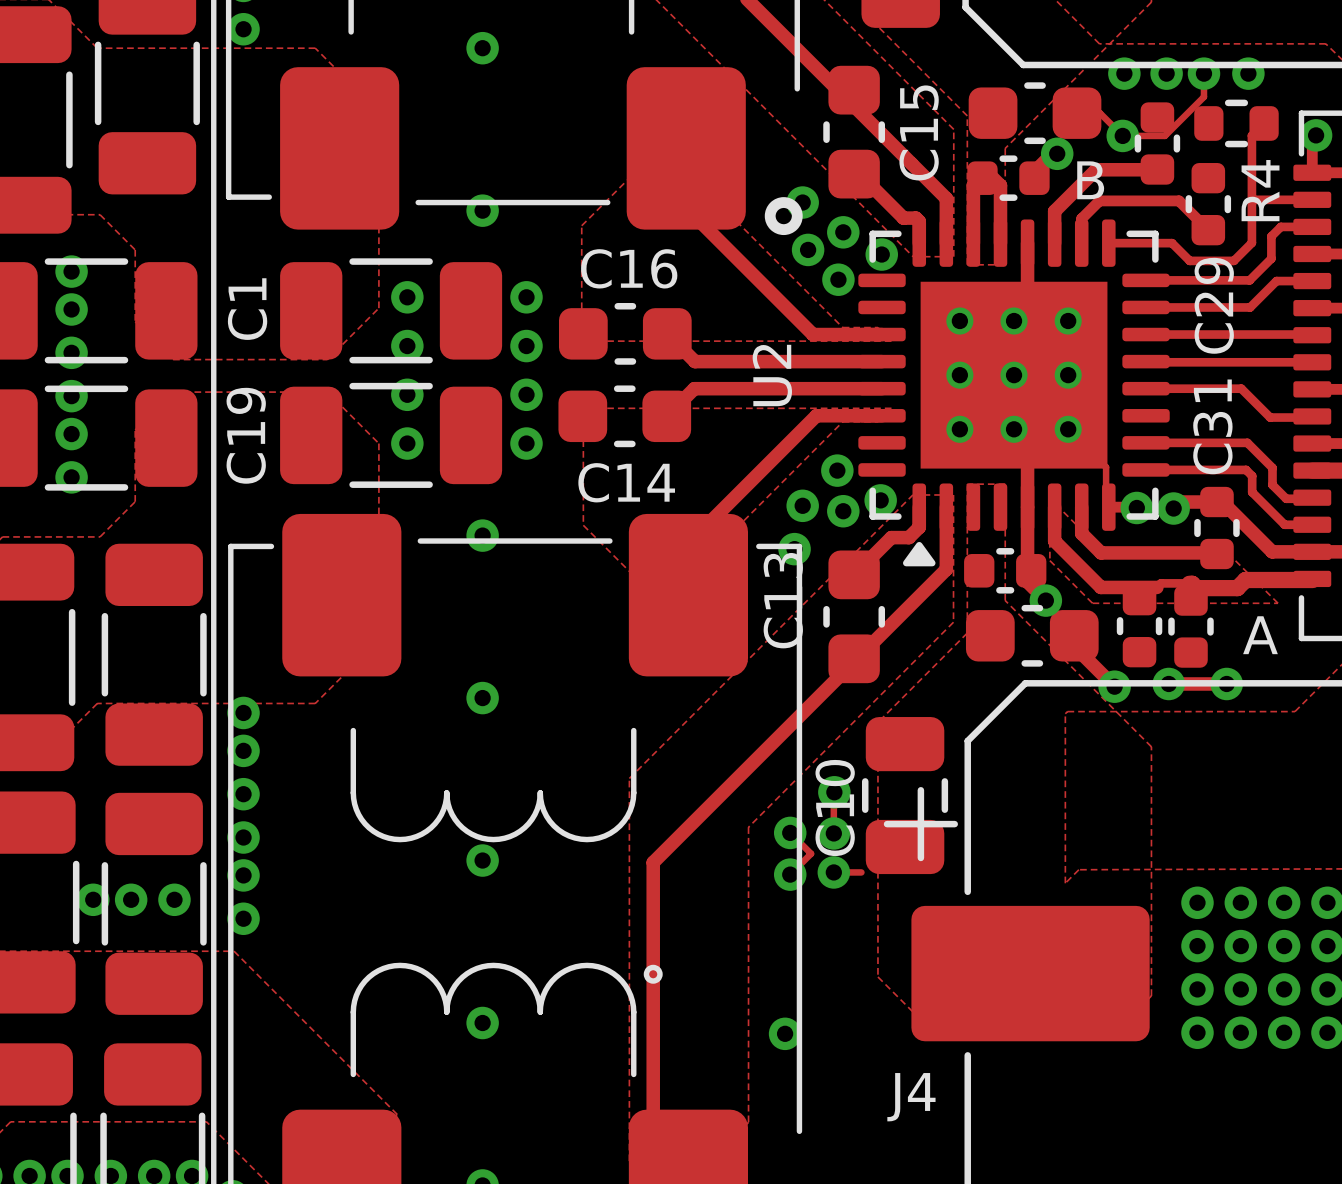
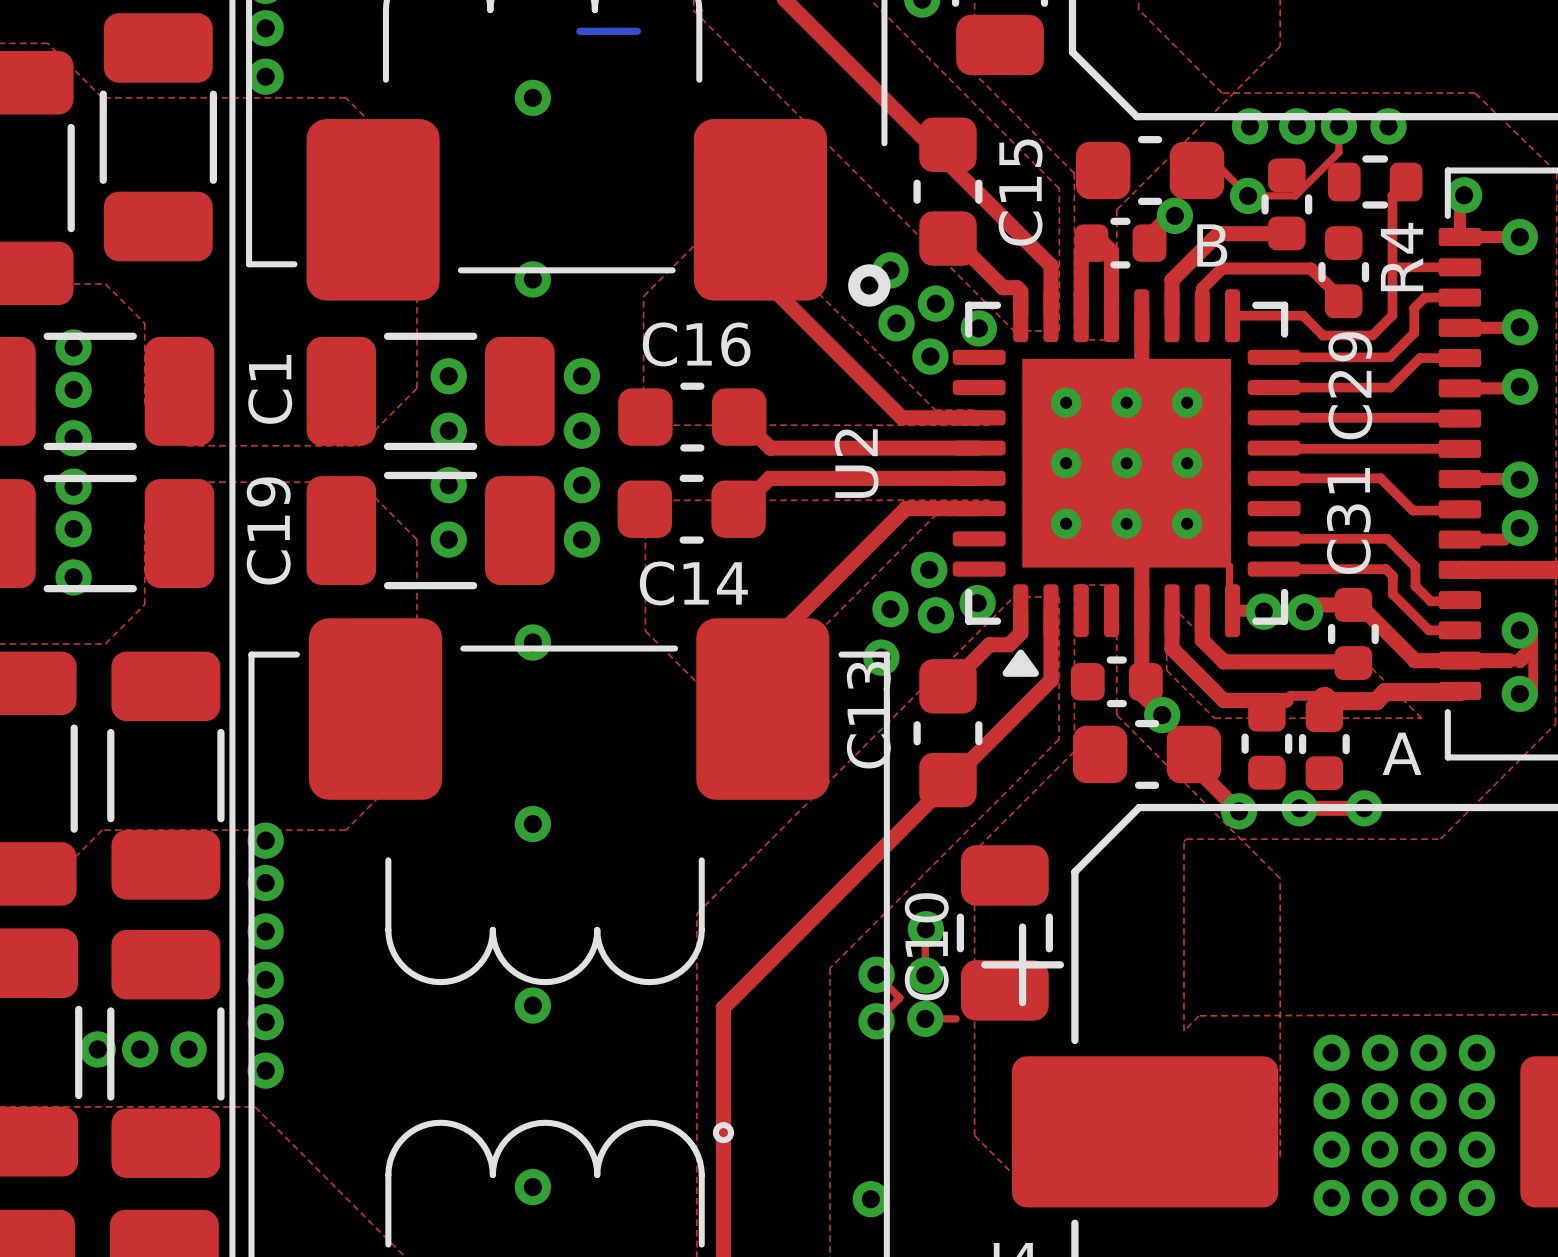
U2 footprint: [858, 219, 1170, 567] -> [952, 289, 1301, 677]

